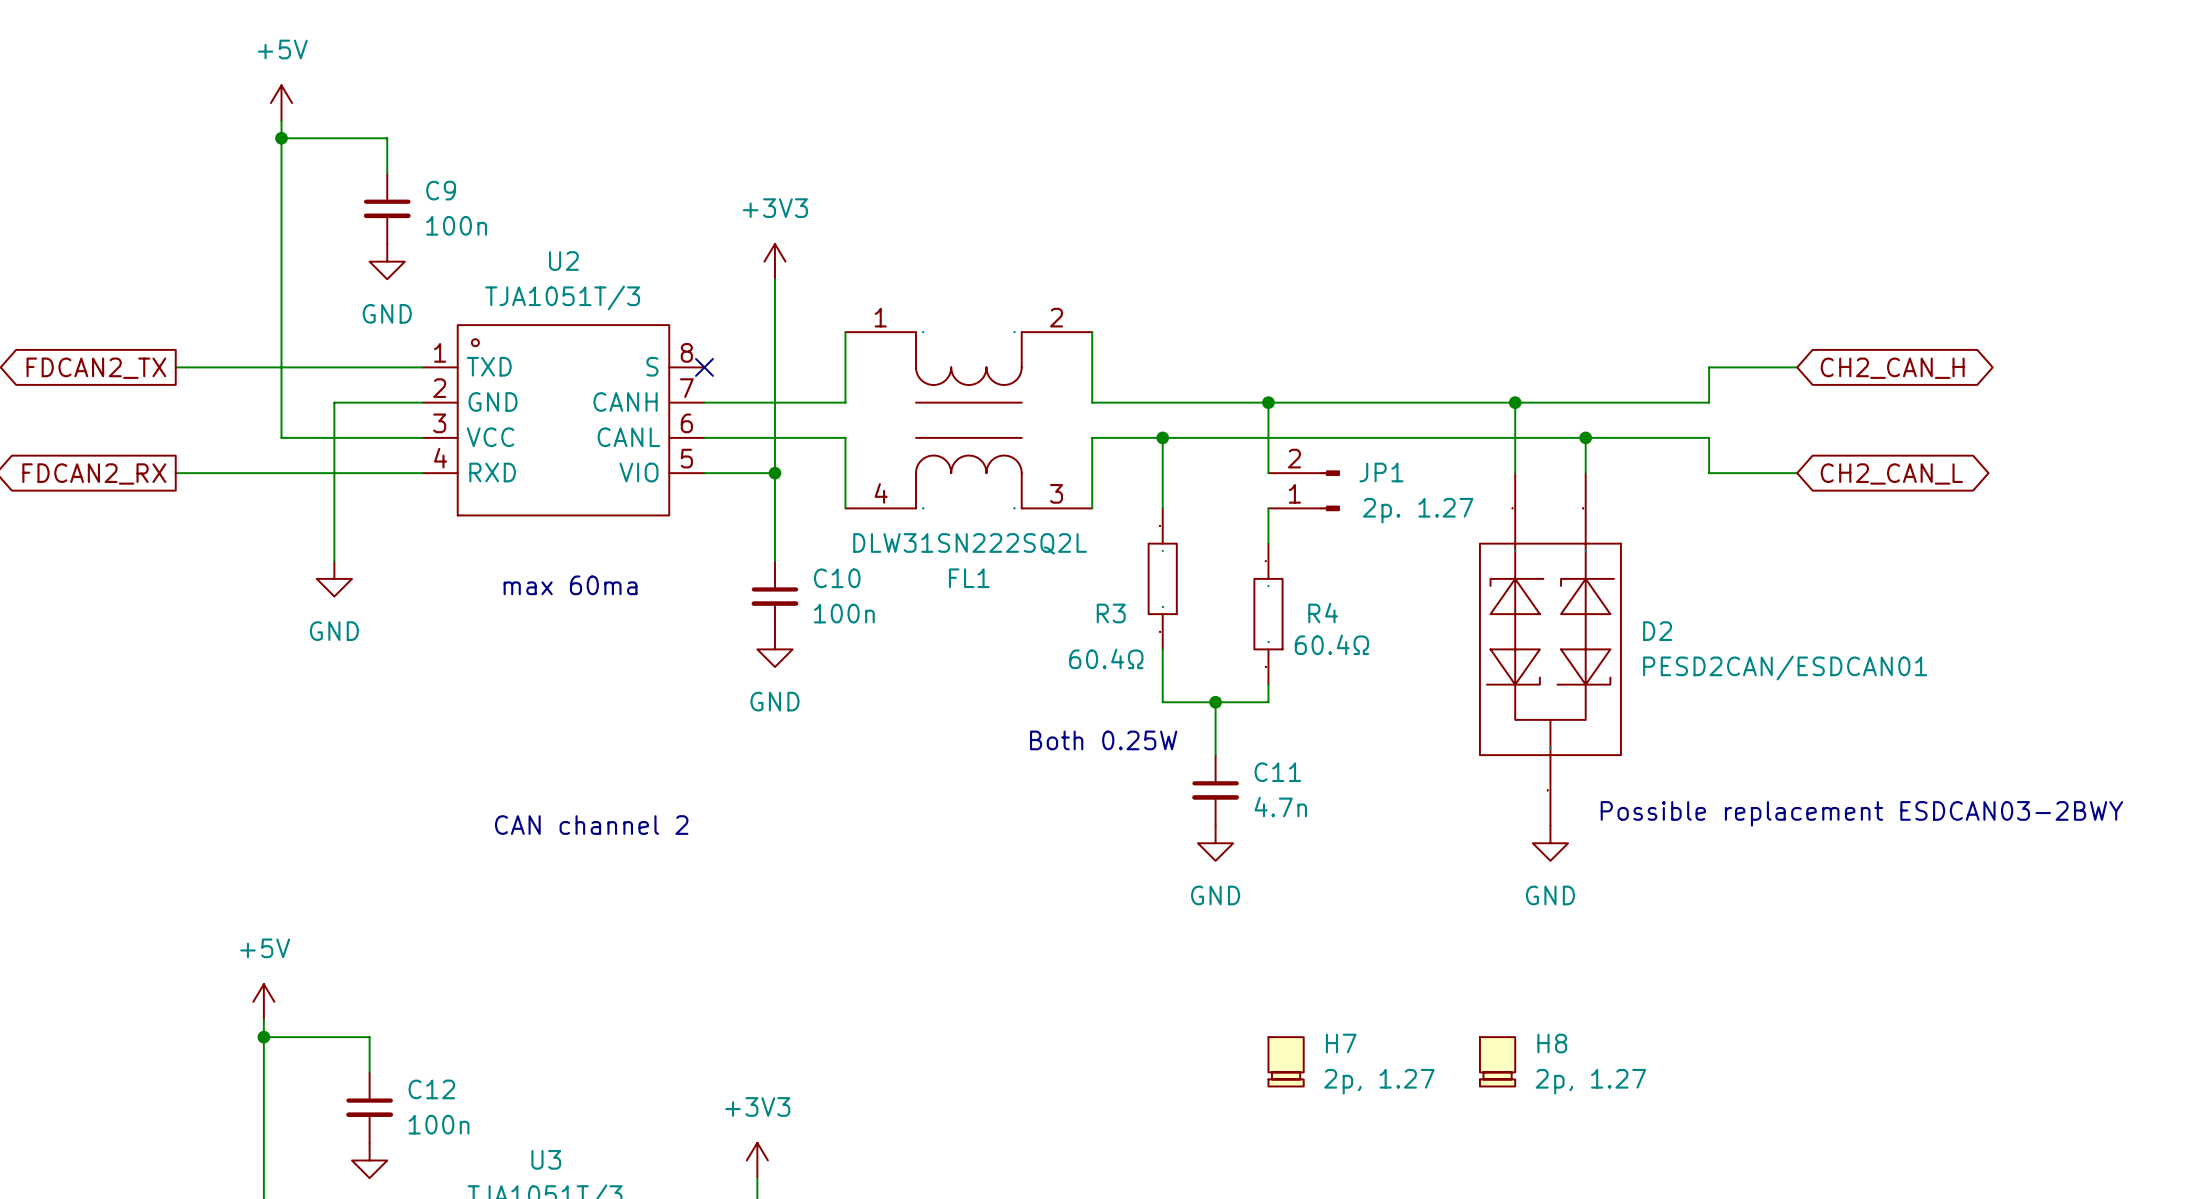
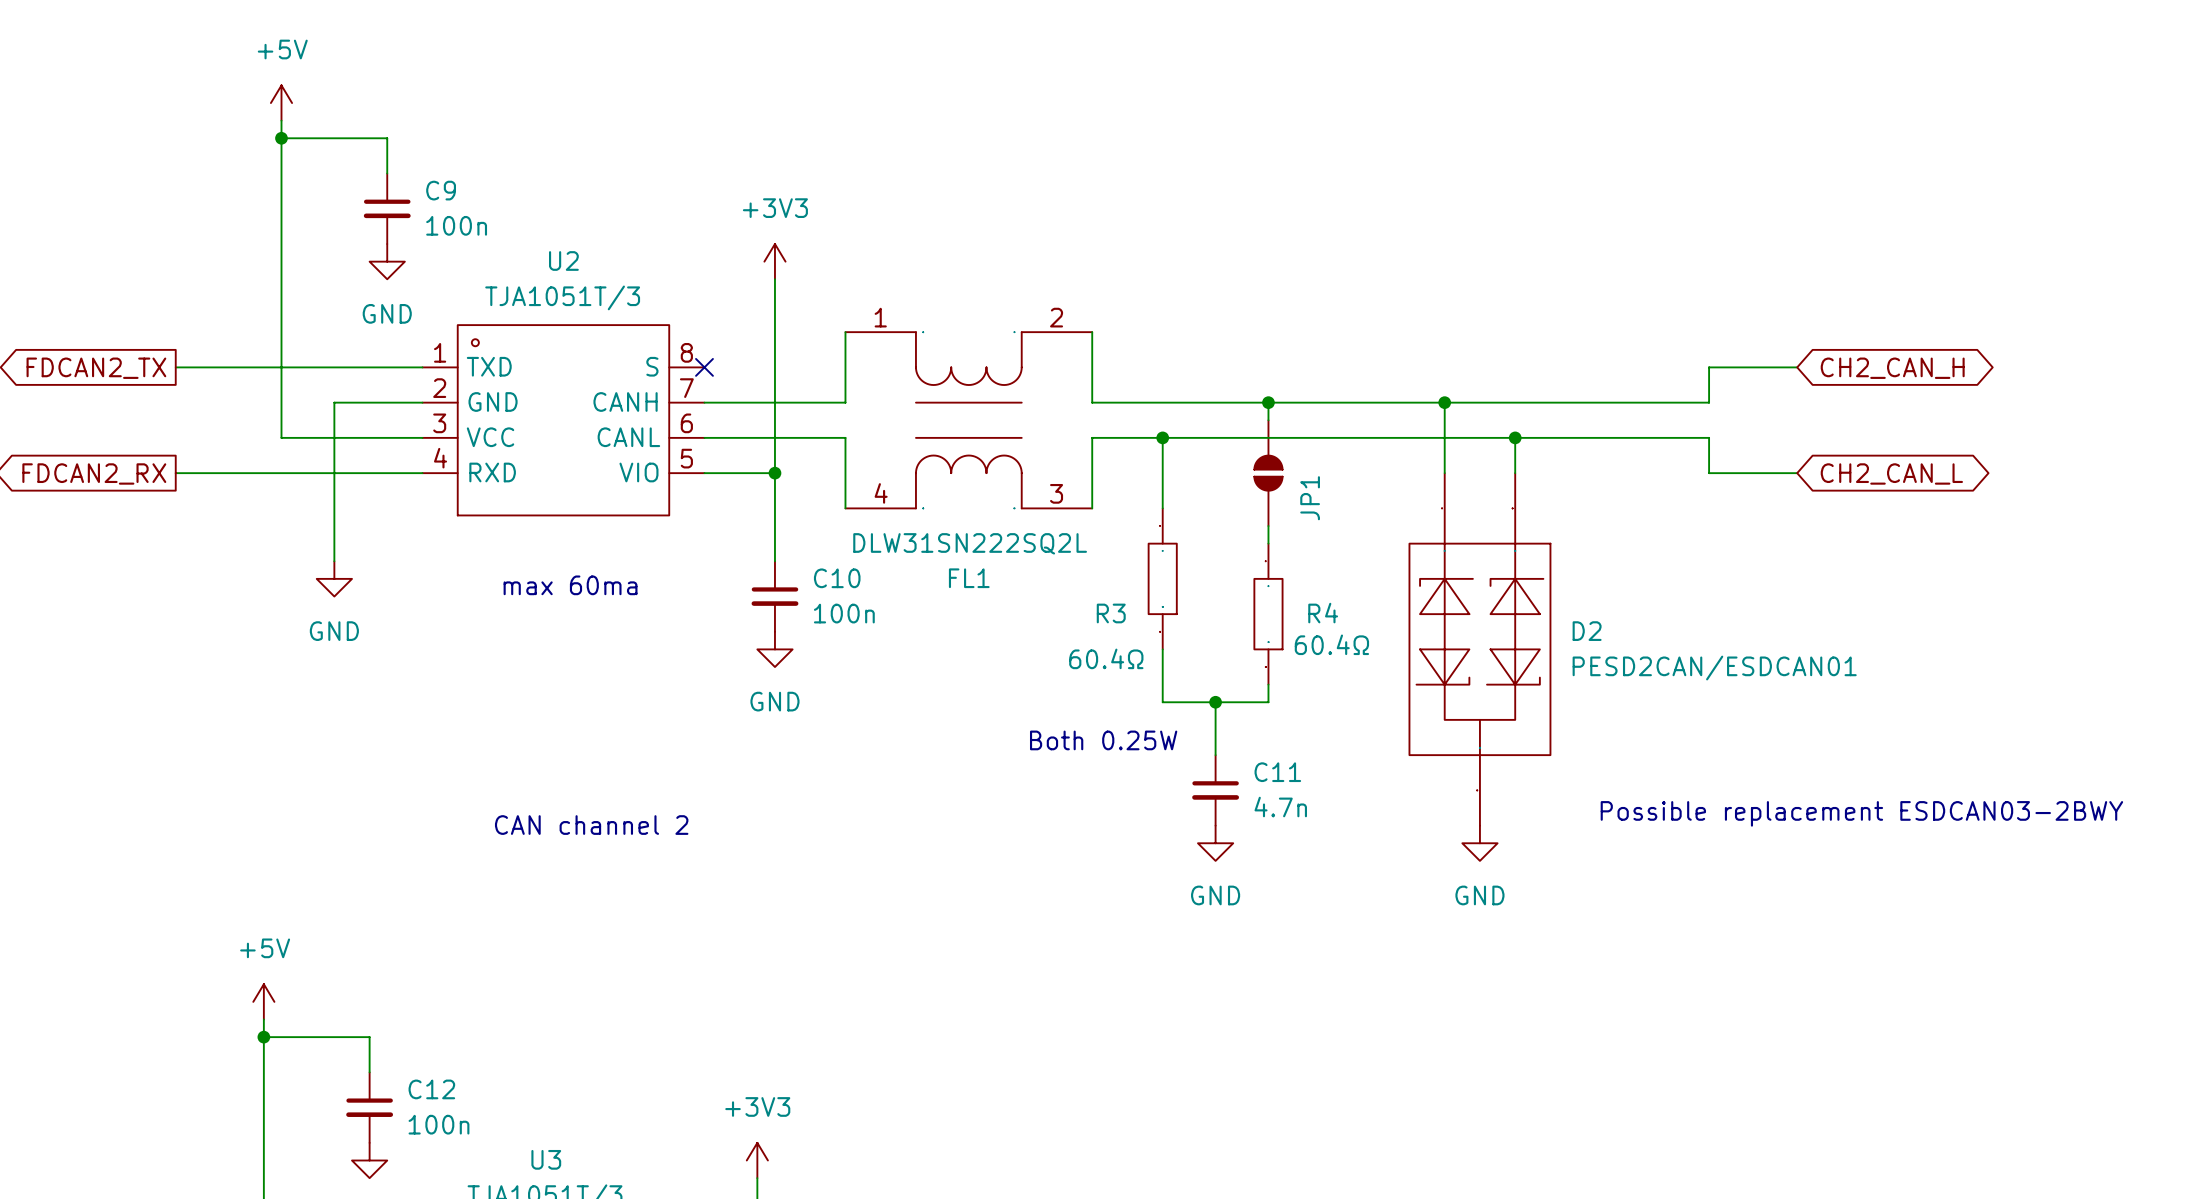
wire: none -> (1444, 402) (1444, 473)
junction: none -> (1444, 402)
wire: (1515, 402) (1515, 437) -> none
junction: (1515, 402) -> none
junction: none -> (1515, 437)
wire: (1585, 437) (1585, 473) -> none
junction: (1585, 437) -> none
JP1 symbol: [1268, 470, 1341, 512] -> [1254, 420, 1283, 527]
JP1 name position: JP1 (1381, 472) -> JP1 (1310, 498)
JP1 value: 2p. 1.27 (1418, 510) -> none
D2 position: (1550, 649) -> (1479, 649)
power symbol position: GND (1550, 843) -> GND (1479, 843)
H7: 2p, 1.27 (1286, 1061) -> none
H8: 2p, 1.27 (1497, 1061) -> none

